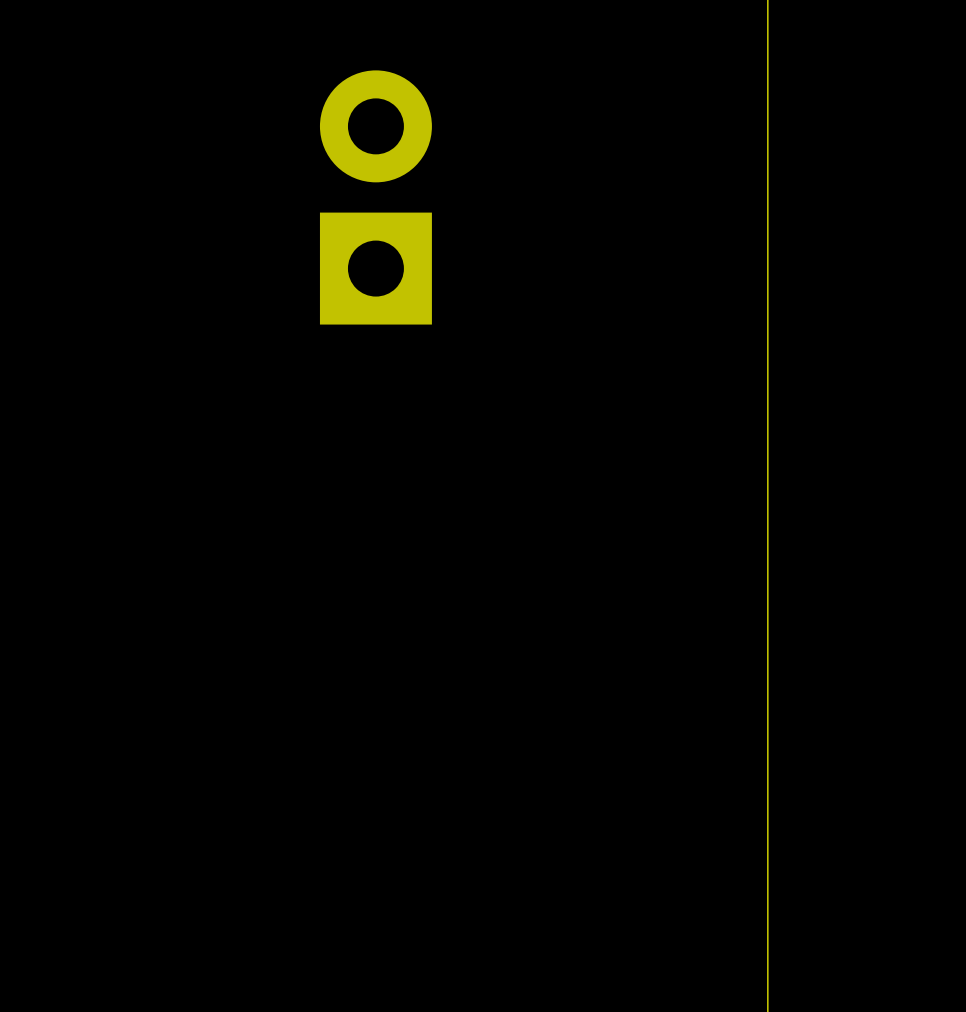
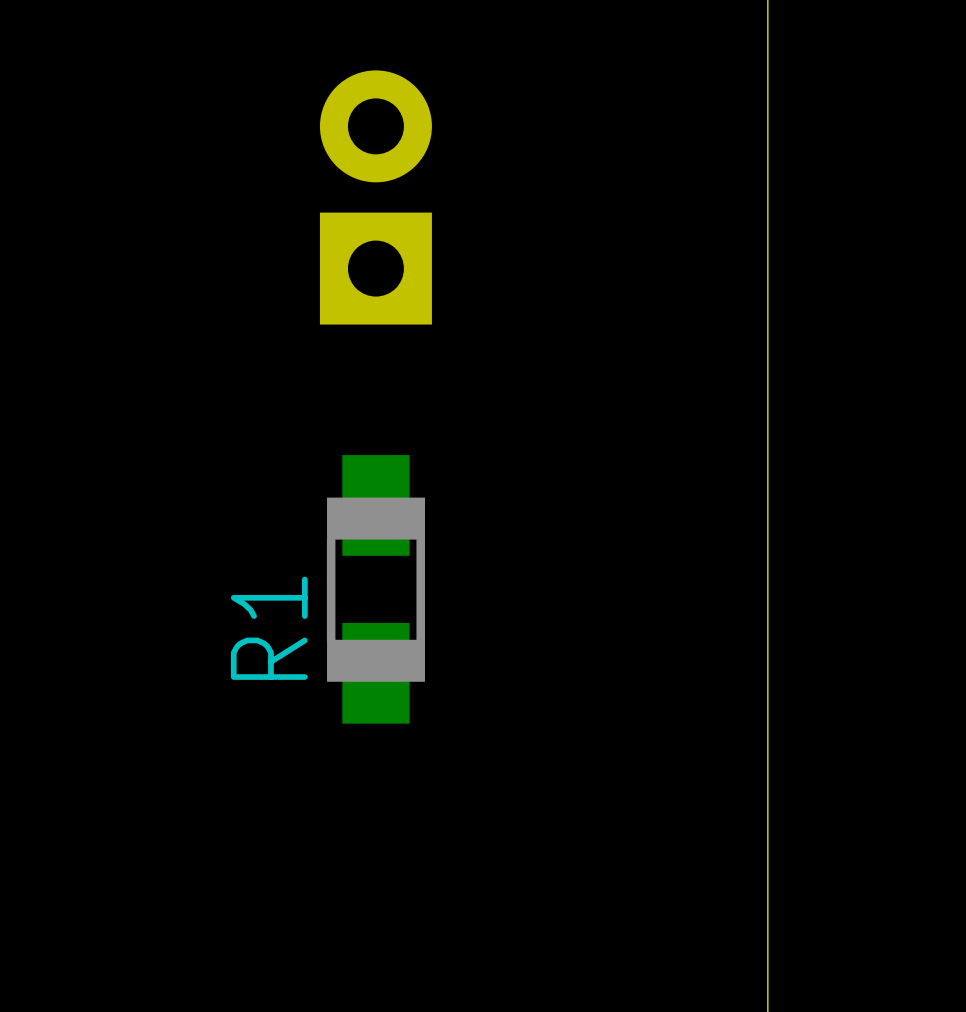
R1: none -> (375, 589)

